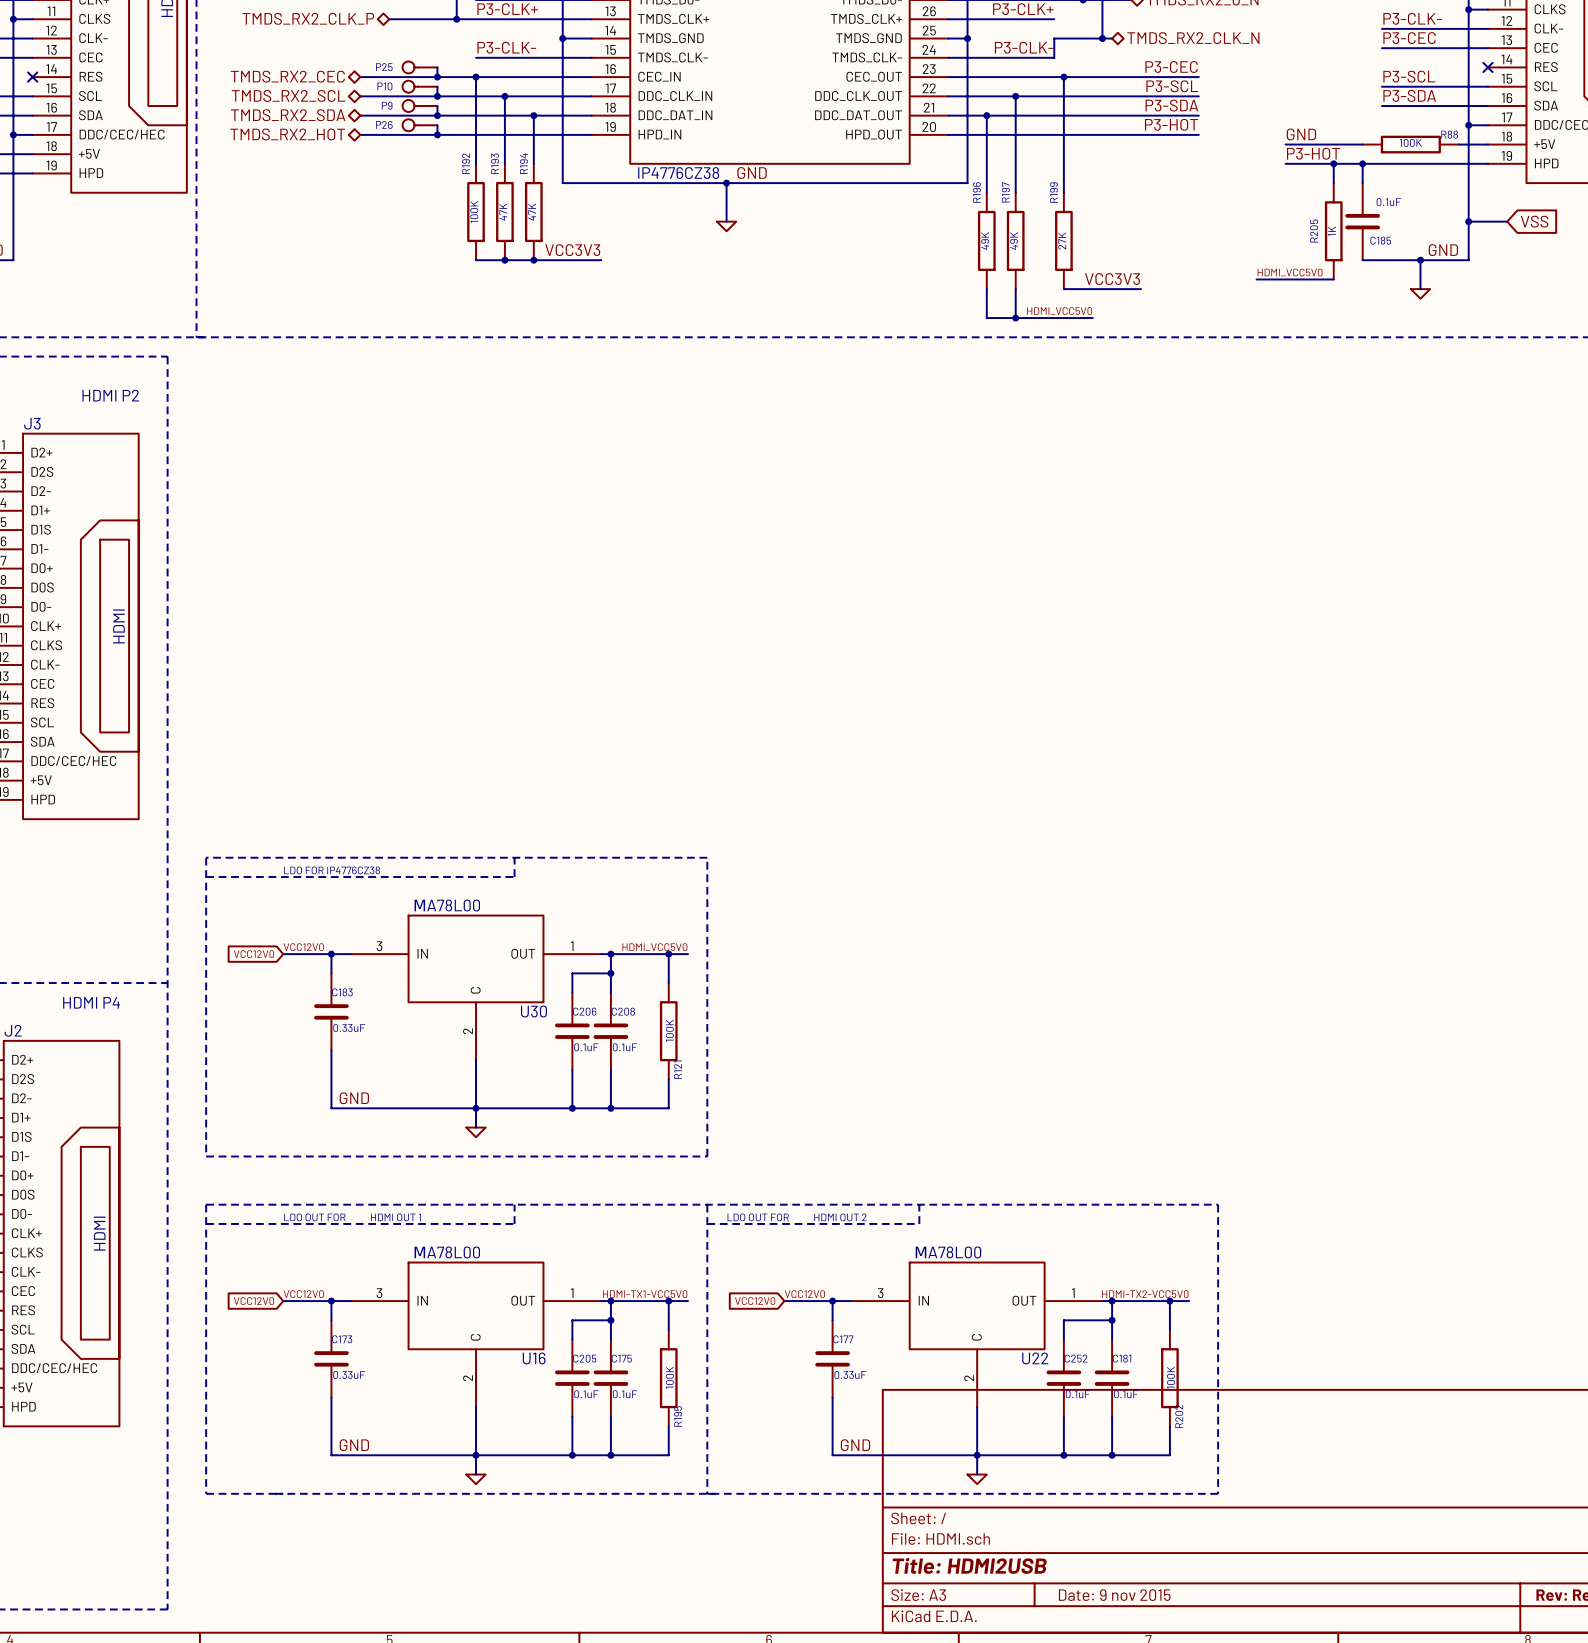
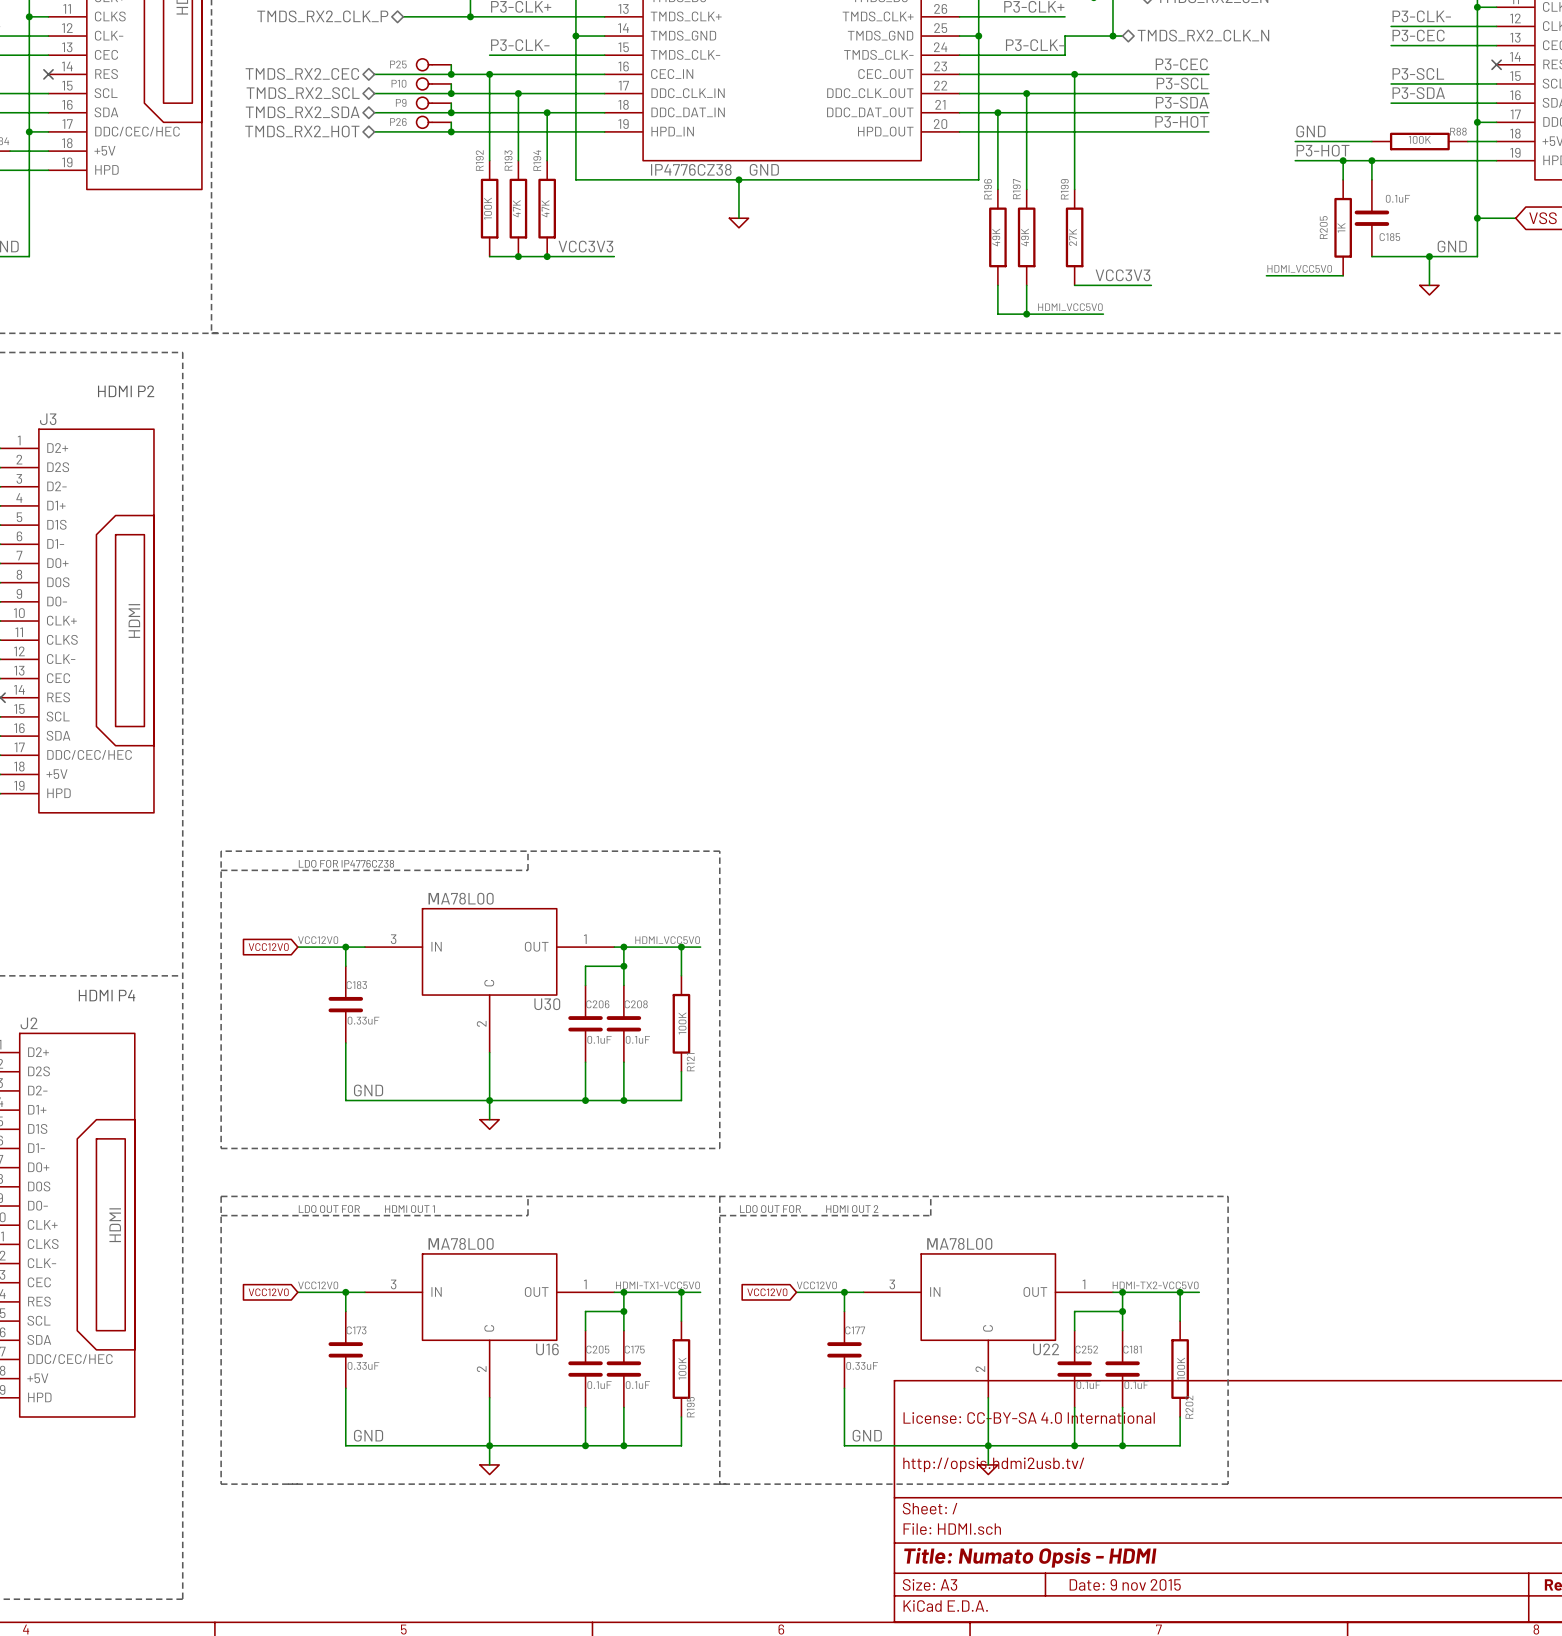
title block: none -> License: CC-BY-SA 4.0 International (1029, 1418)
title block: none -> http://opsis.hdmi2usb.tv/ (993, 1464)
title block: Title: HDMI2USB (969, 1565) -> Title: Numato Opsis - HDMI (1030, 1557)

